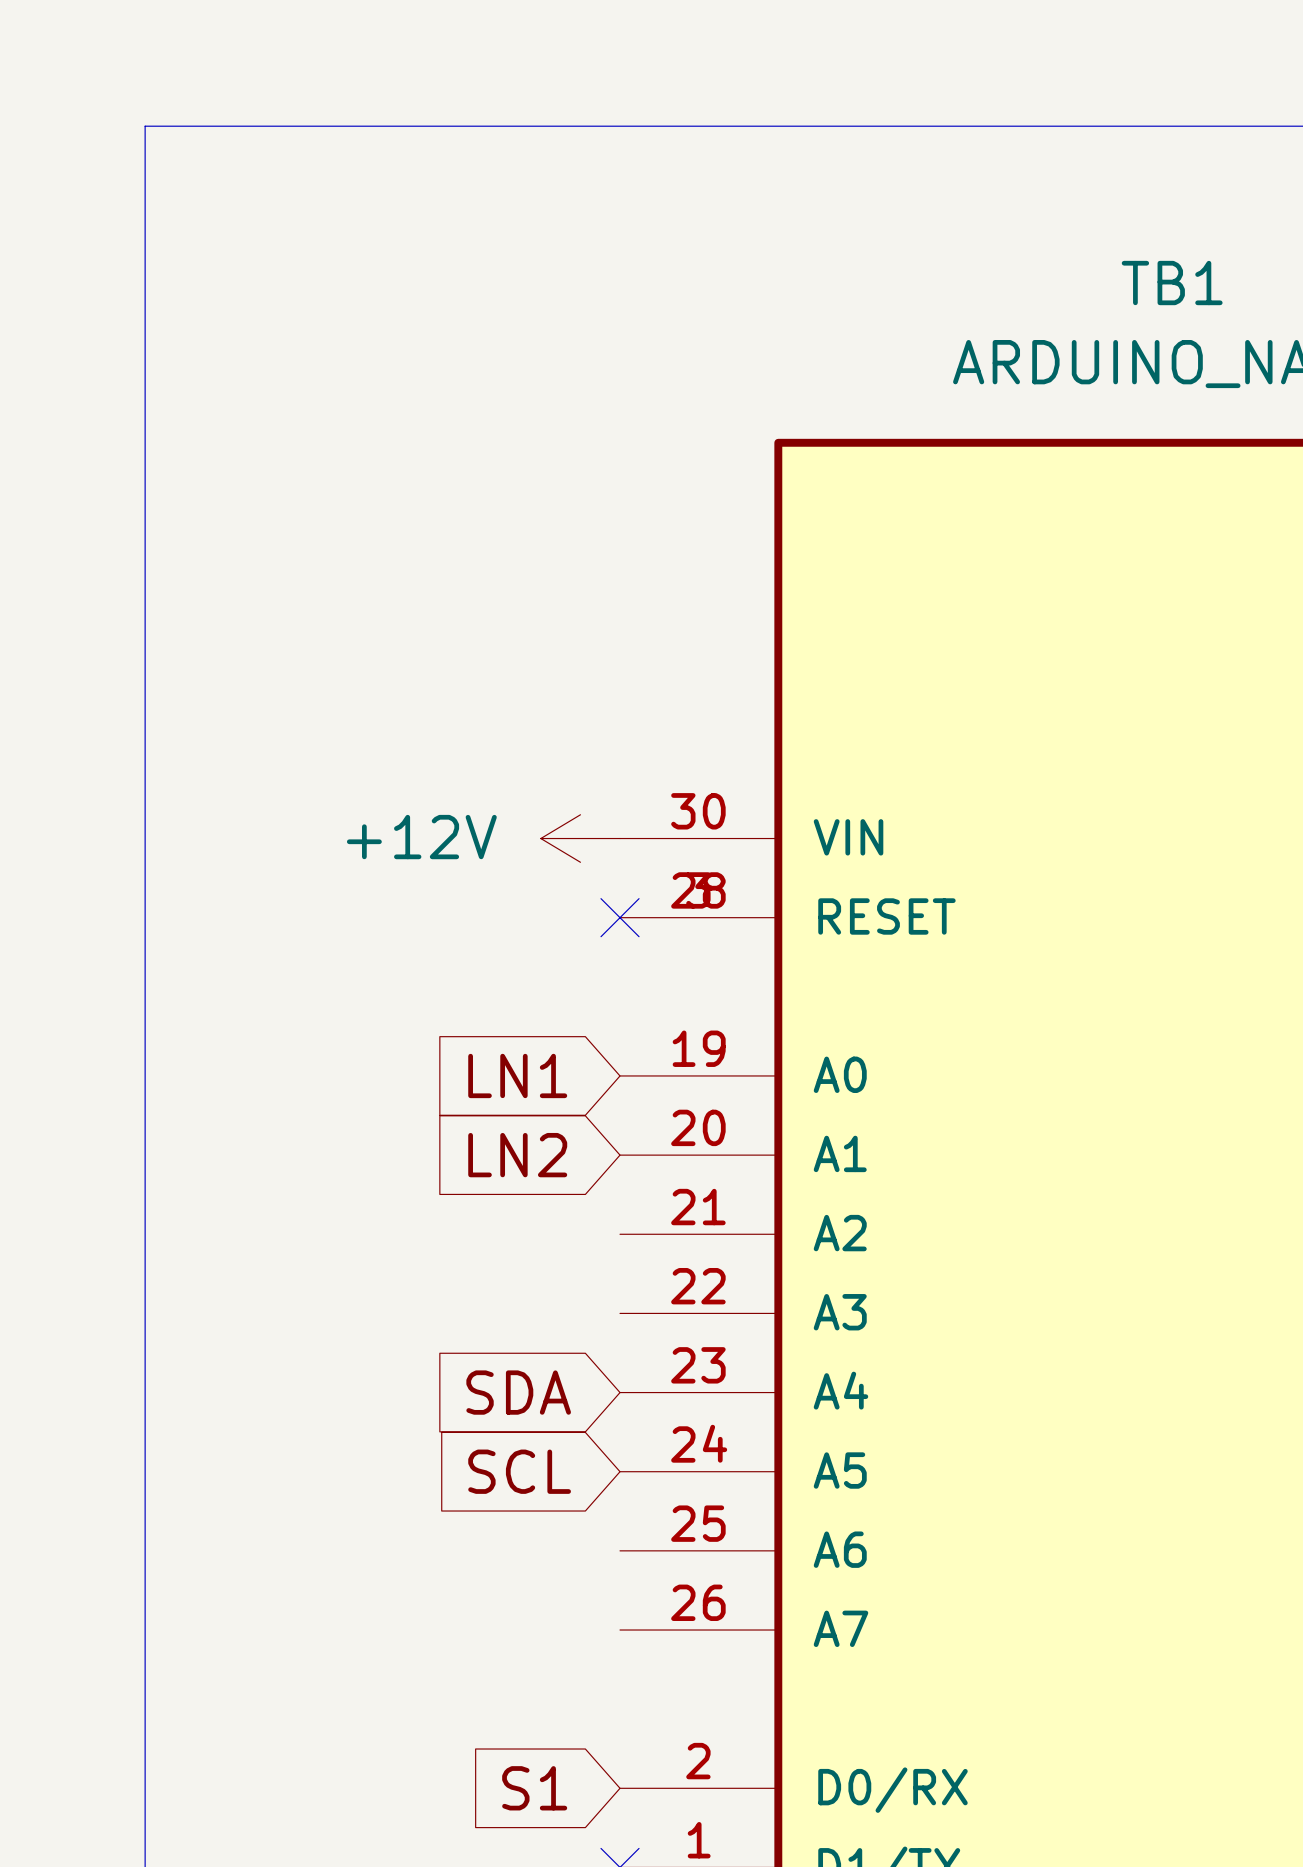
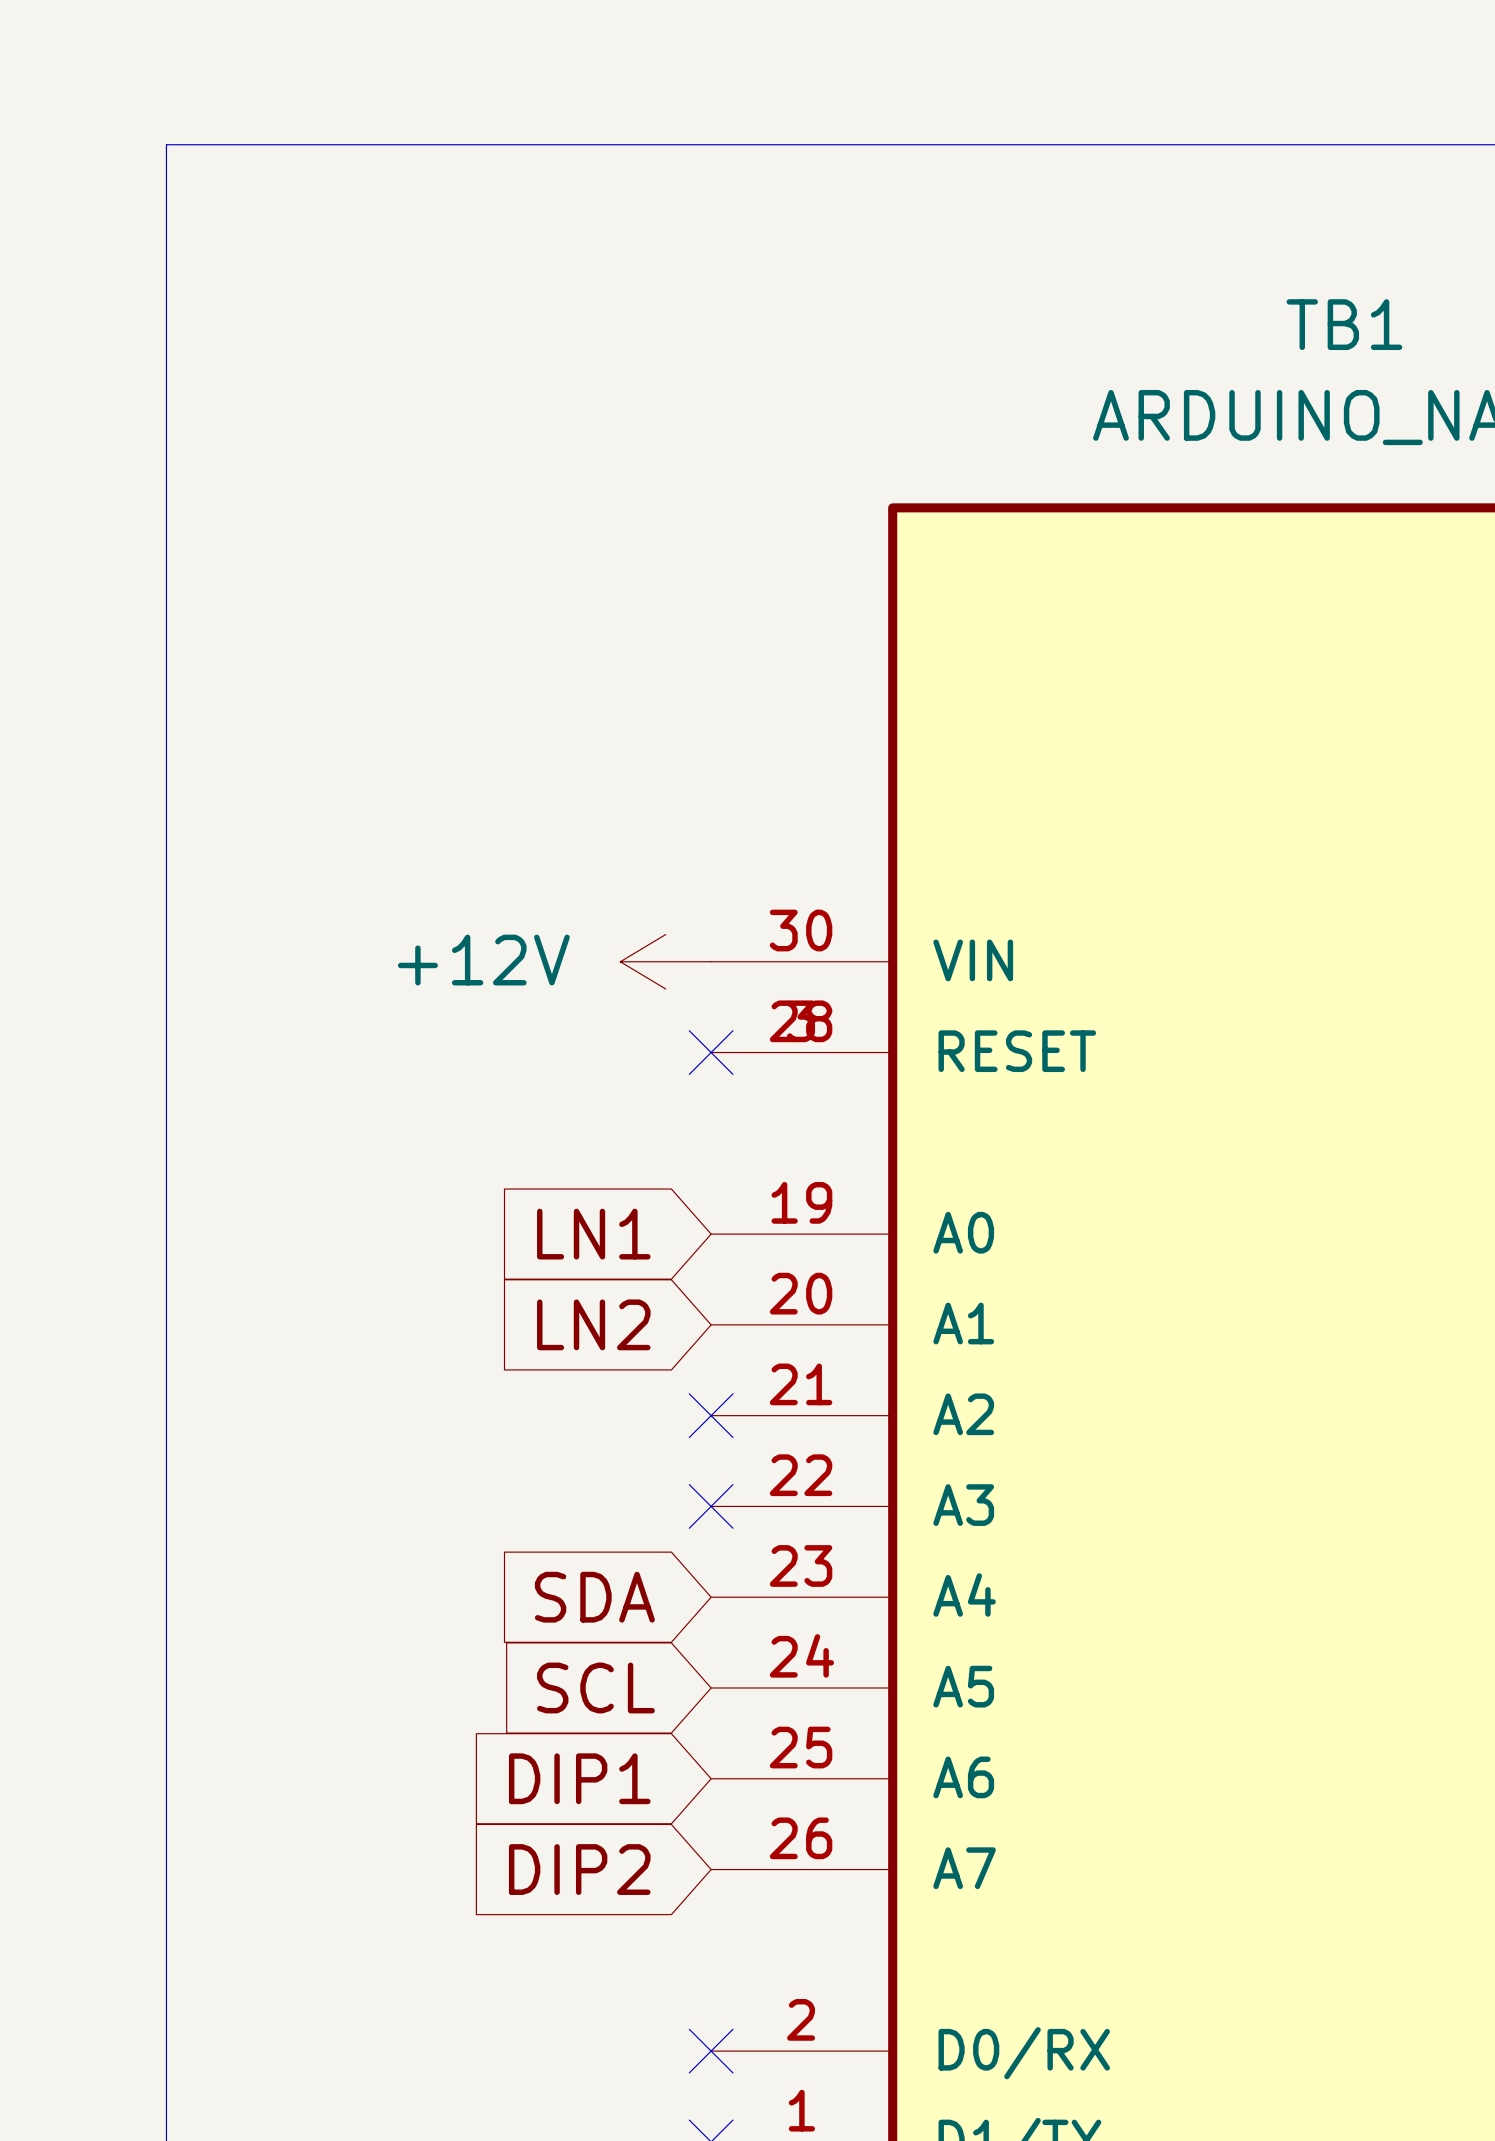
no-connect mark: none -> (711, 1415)
no-connect mark: none -> (711, 1506)
global label: none -> DIP1 (579, 1778)
global label: none -> DIP2 (579, 1869)
global label: S1 (534, 1788) -> none
no-connect mark: none -> (711, 2051)

